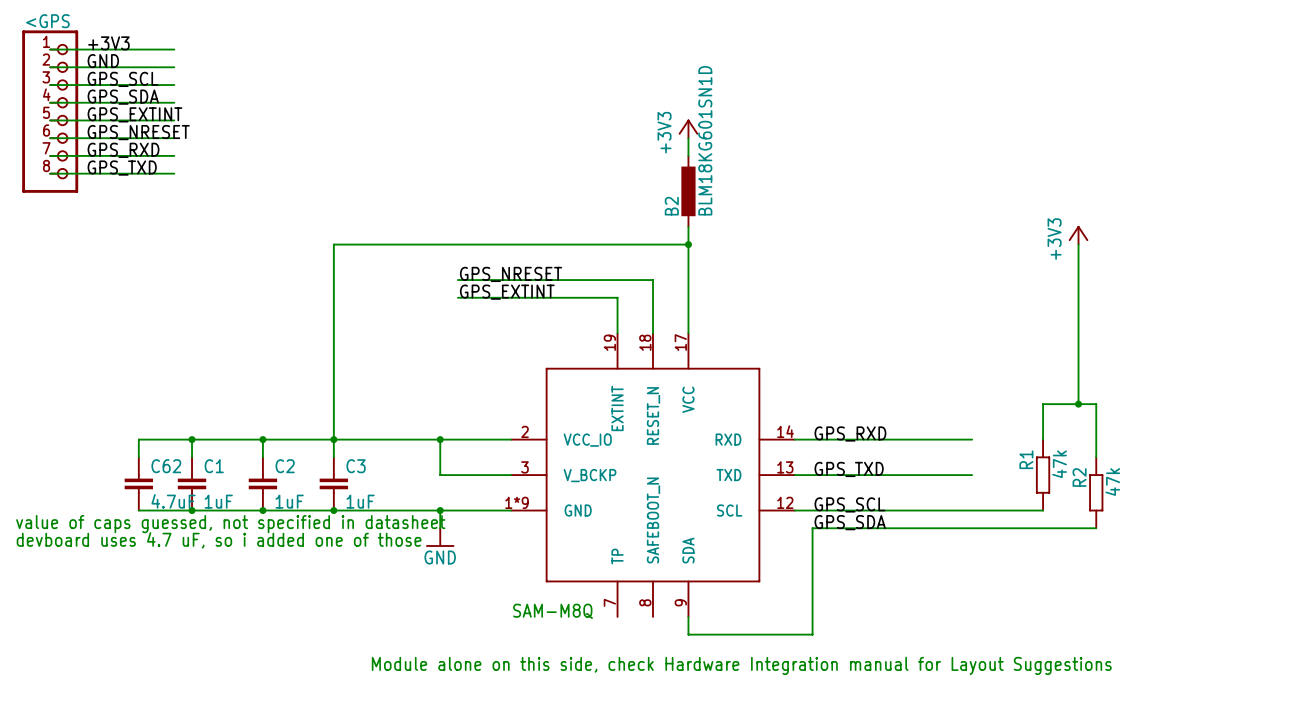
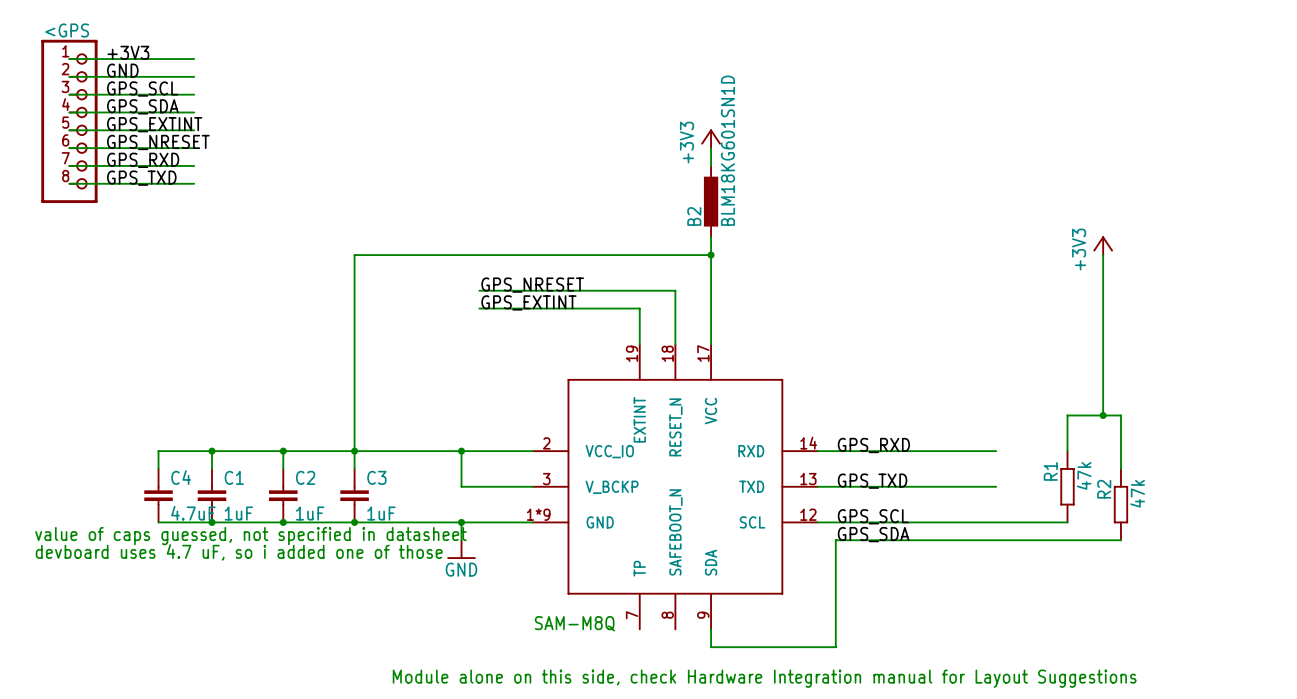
C62 name: C62 (166, 466) -> C4 (181, 477)

